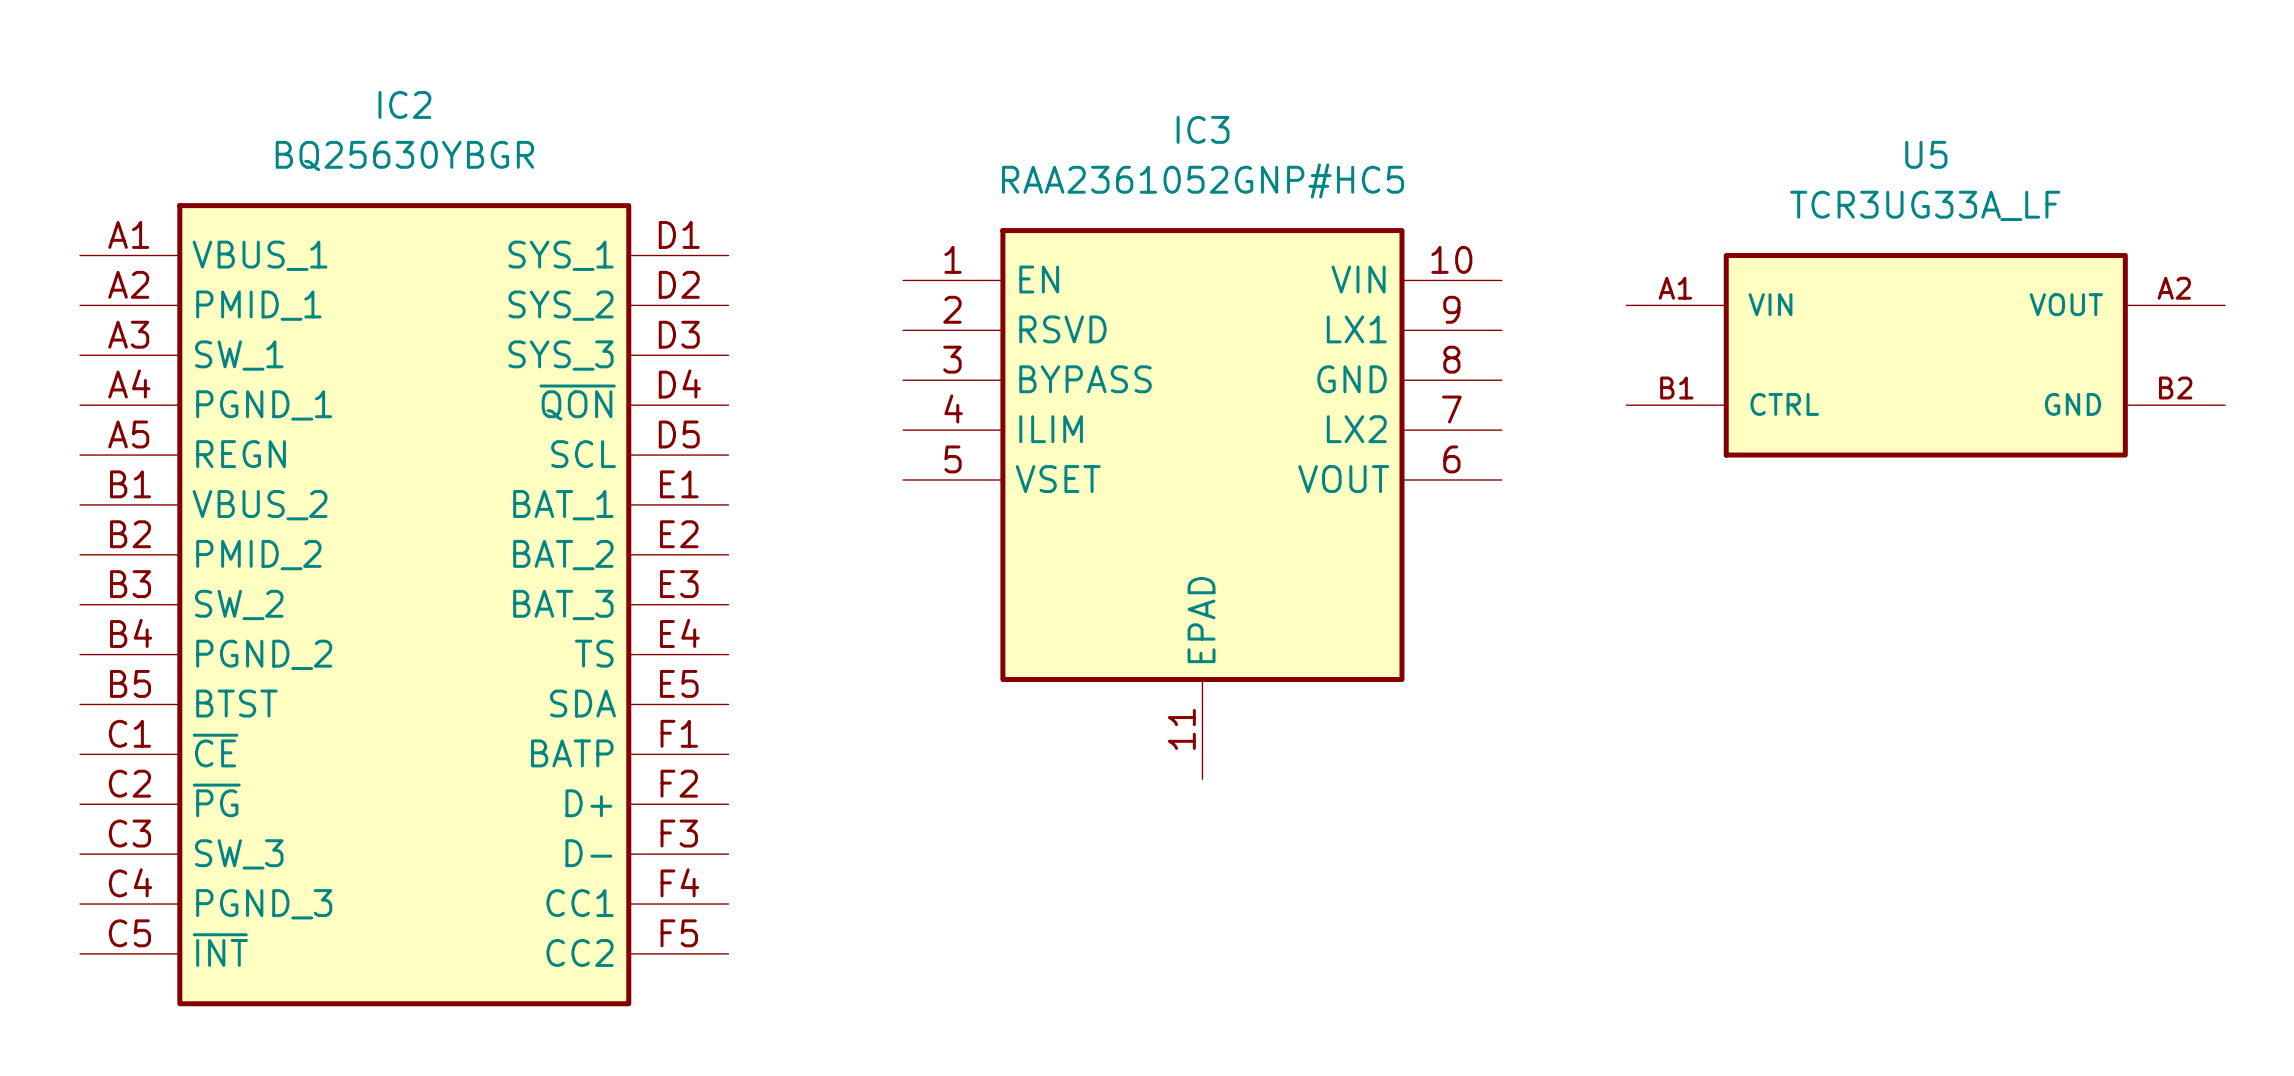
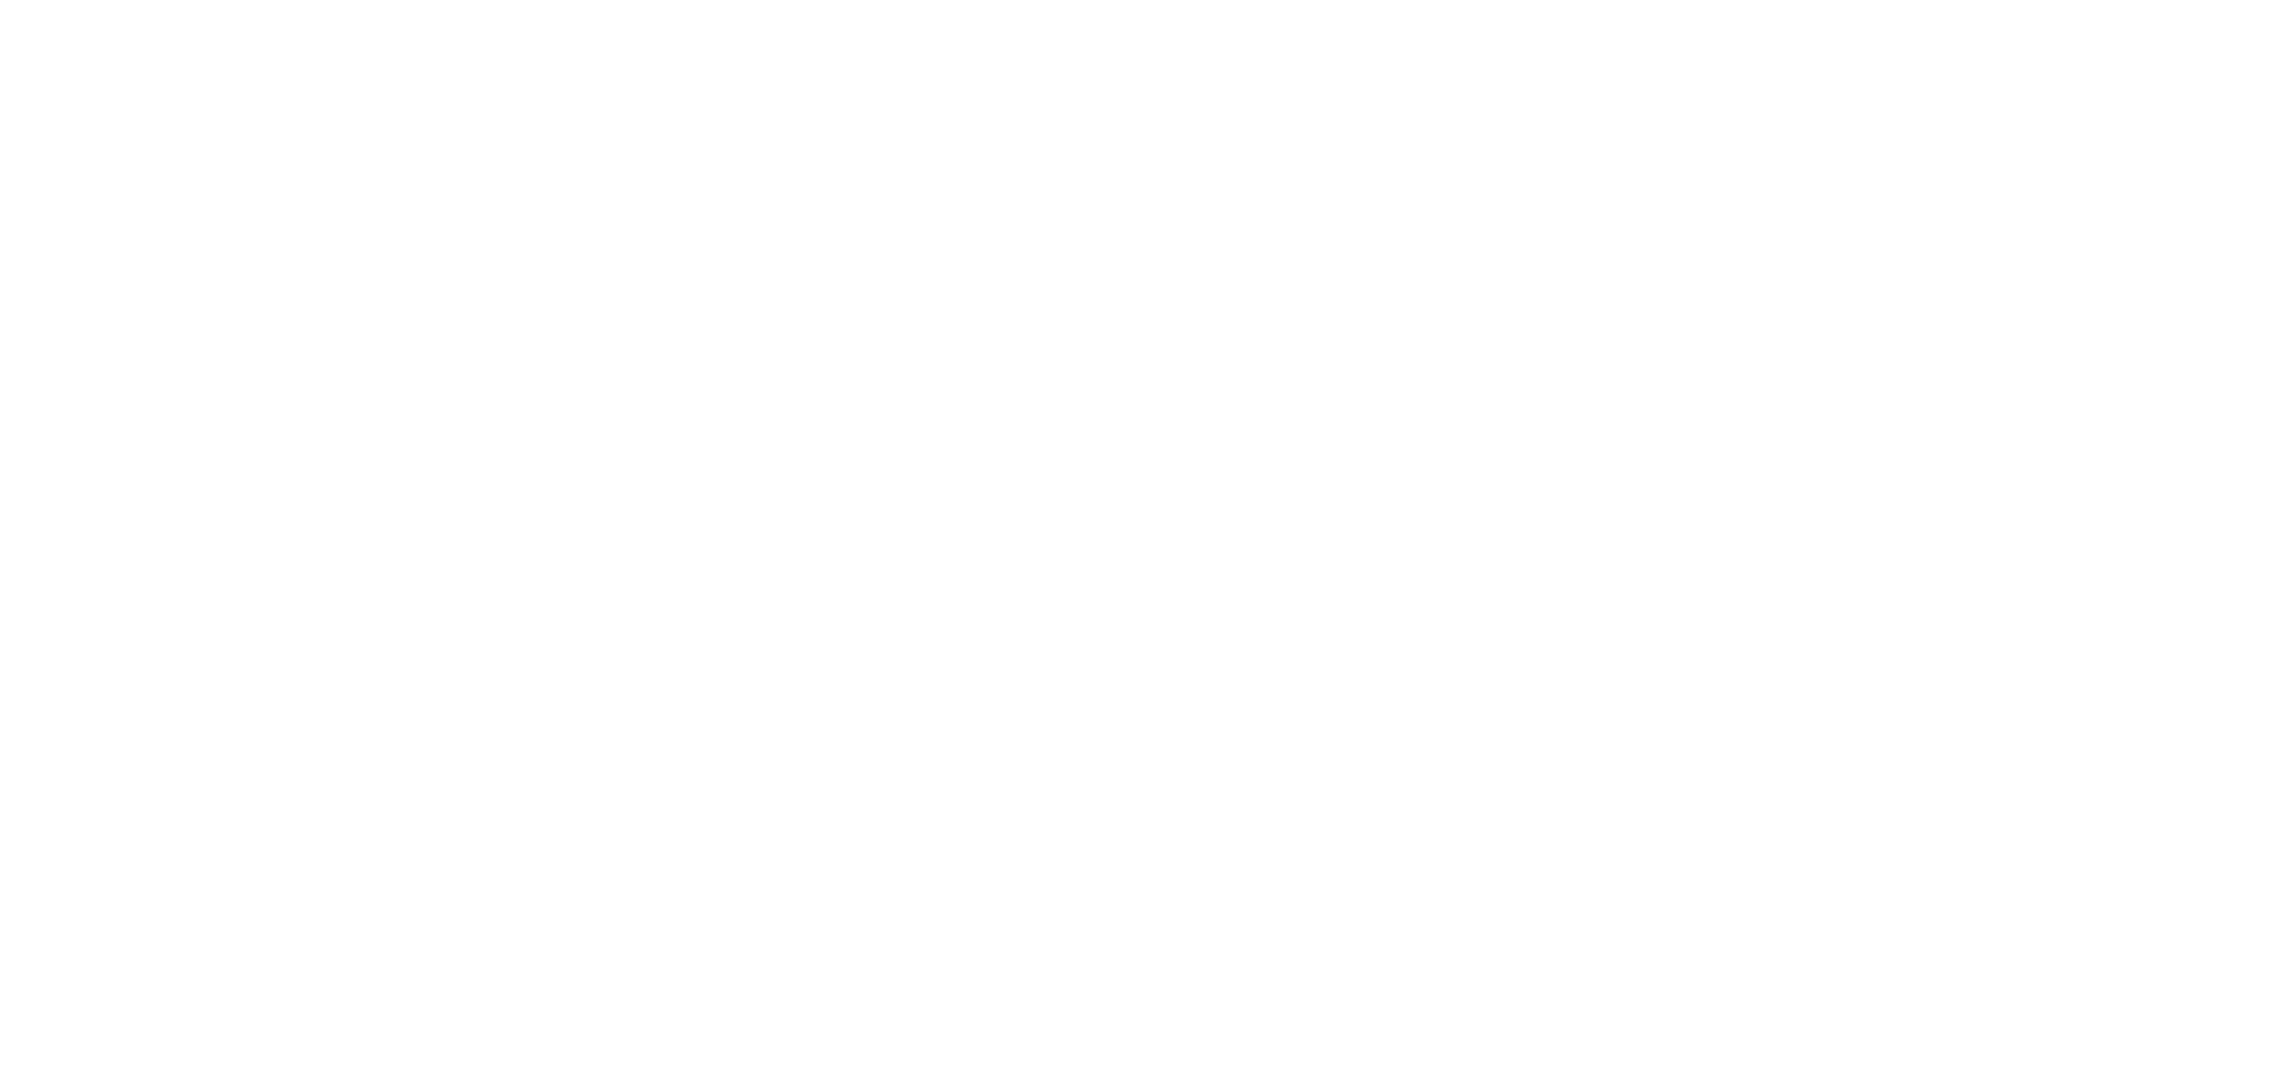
U5: TCR3UG33A_LF (1925, 355) -> none
IC3: RAA2361052GNP#HC5 (1202, 503) -> none
IC2: BQ25630YBGR (404, 604) -> none

